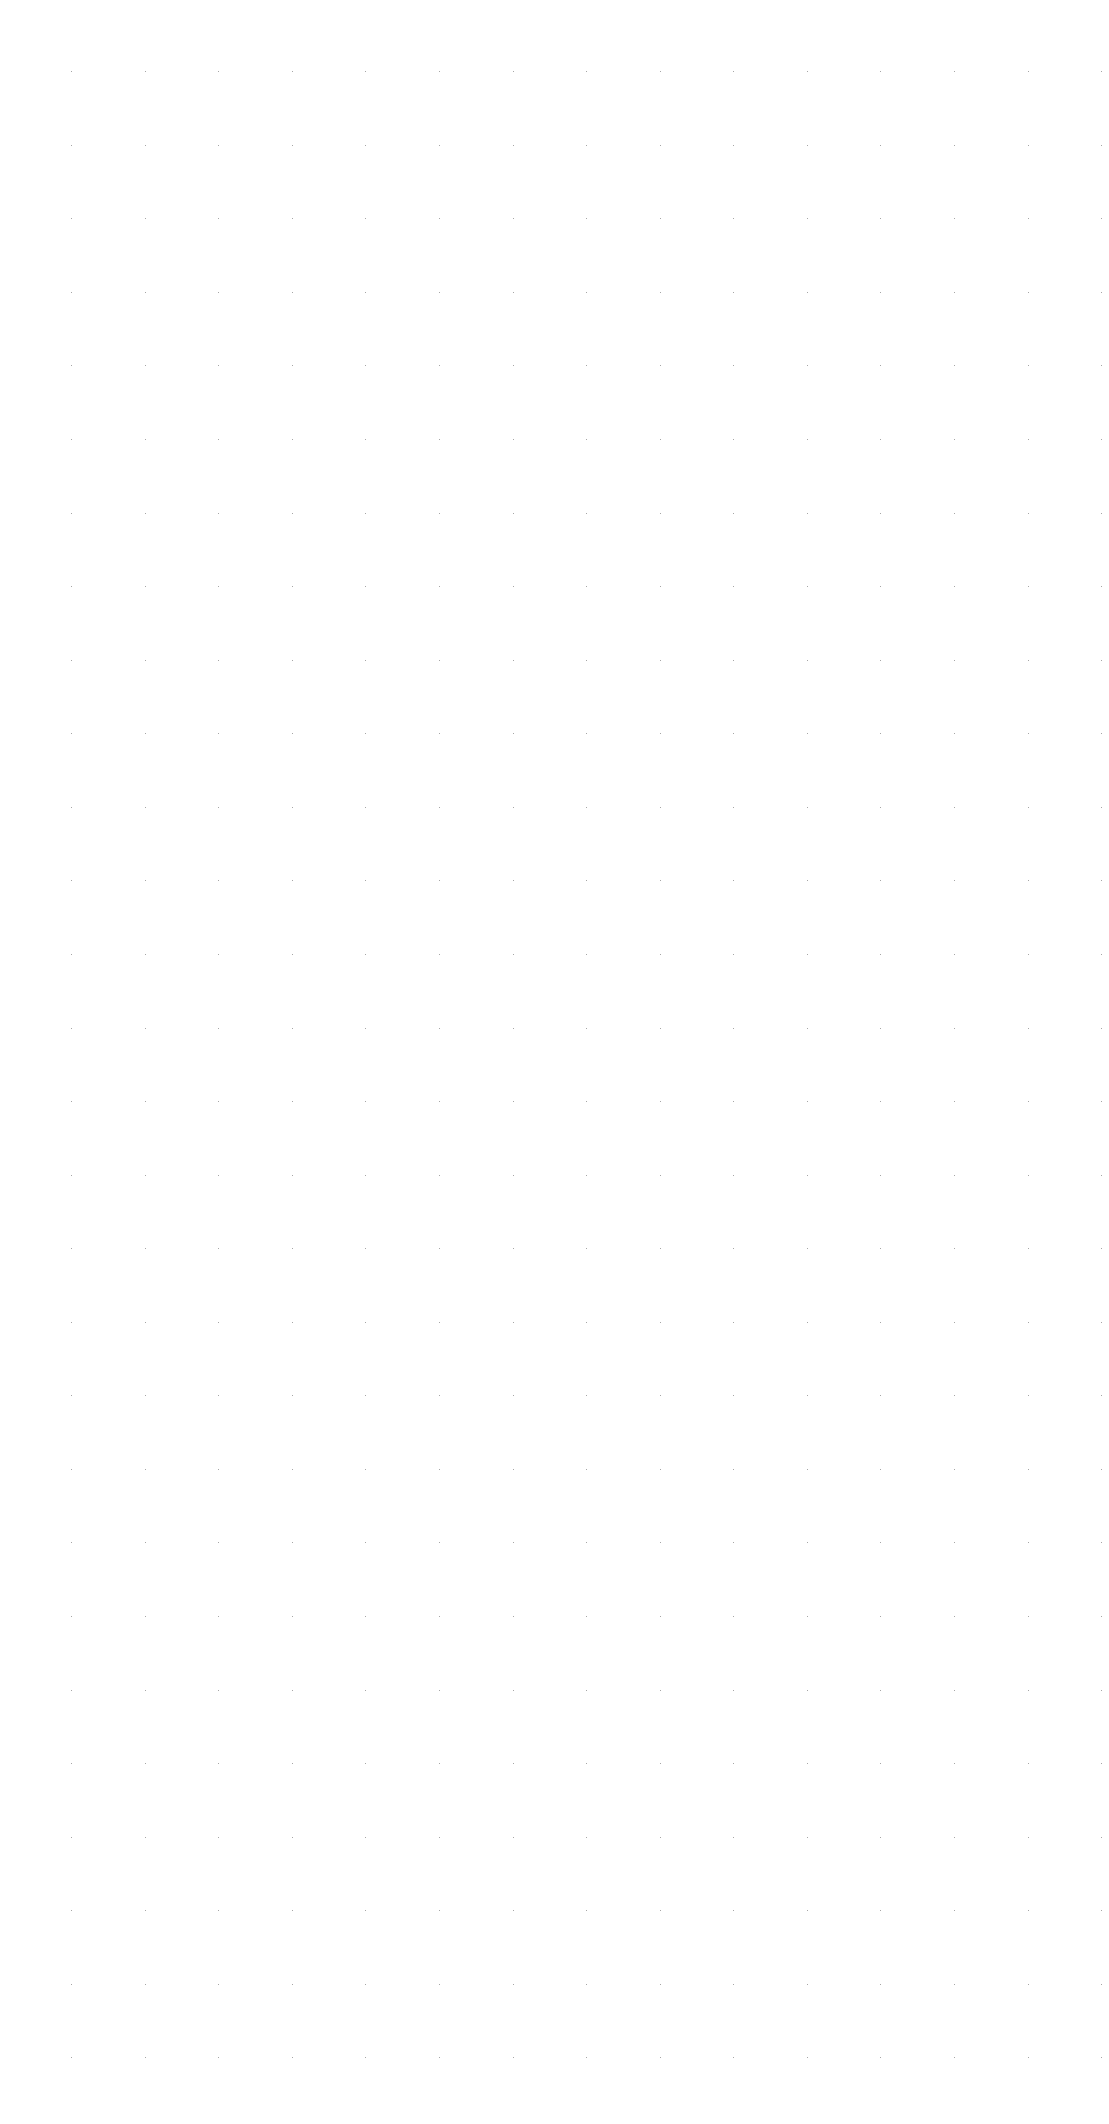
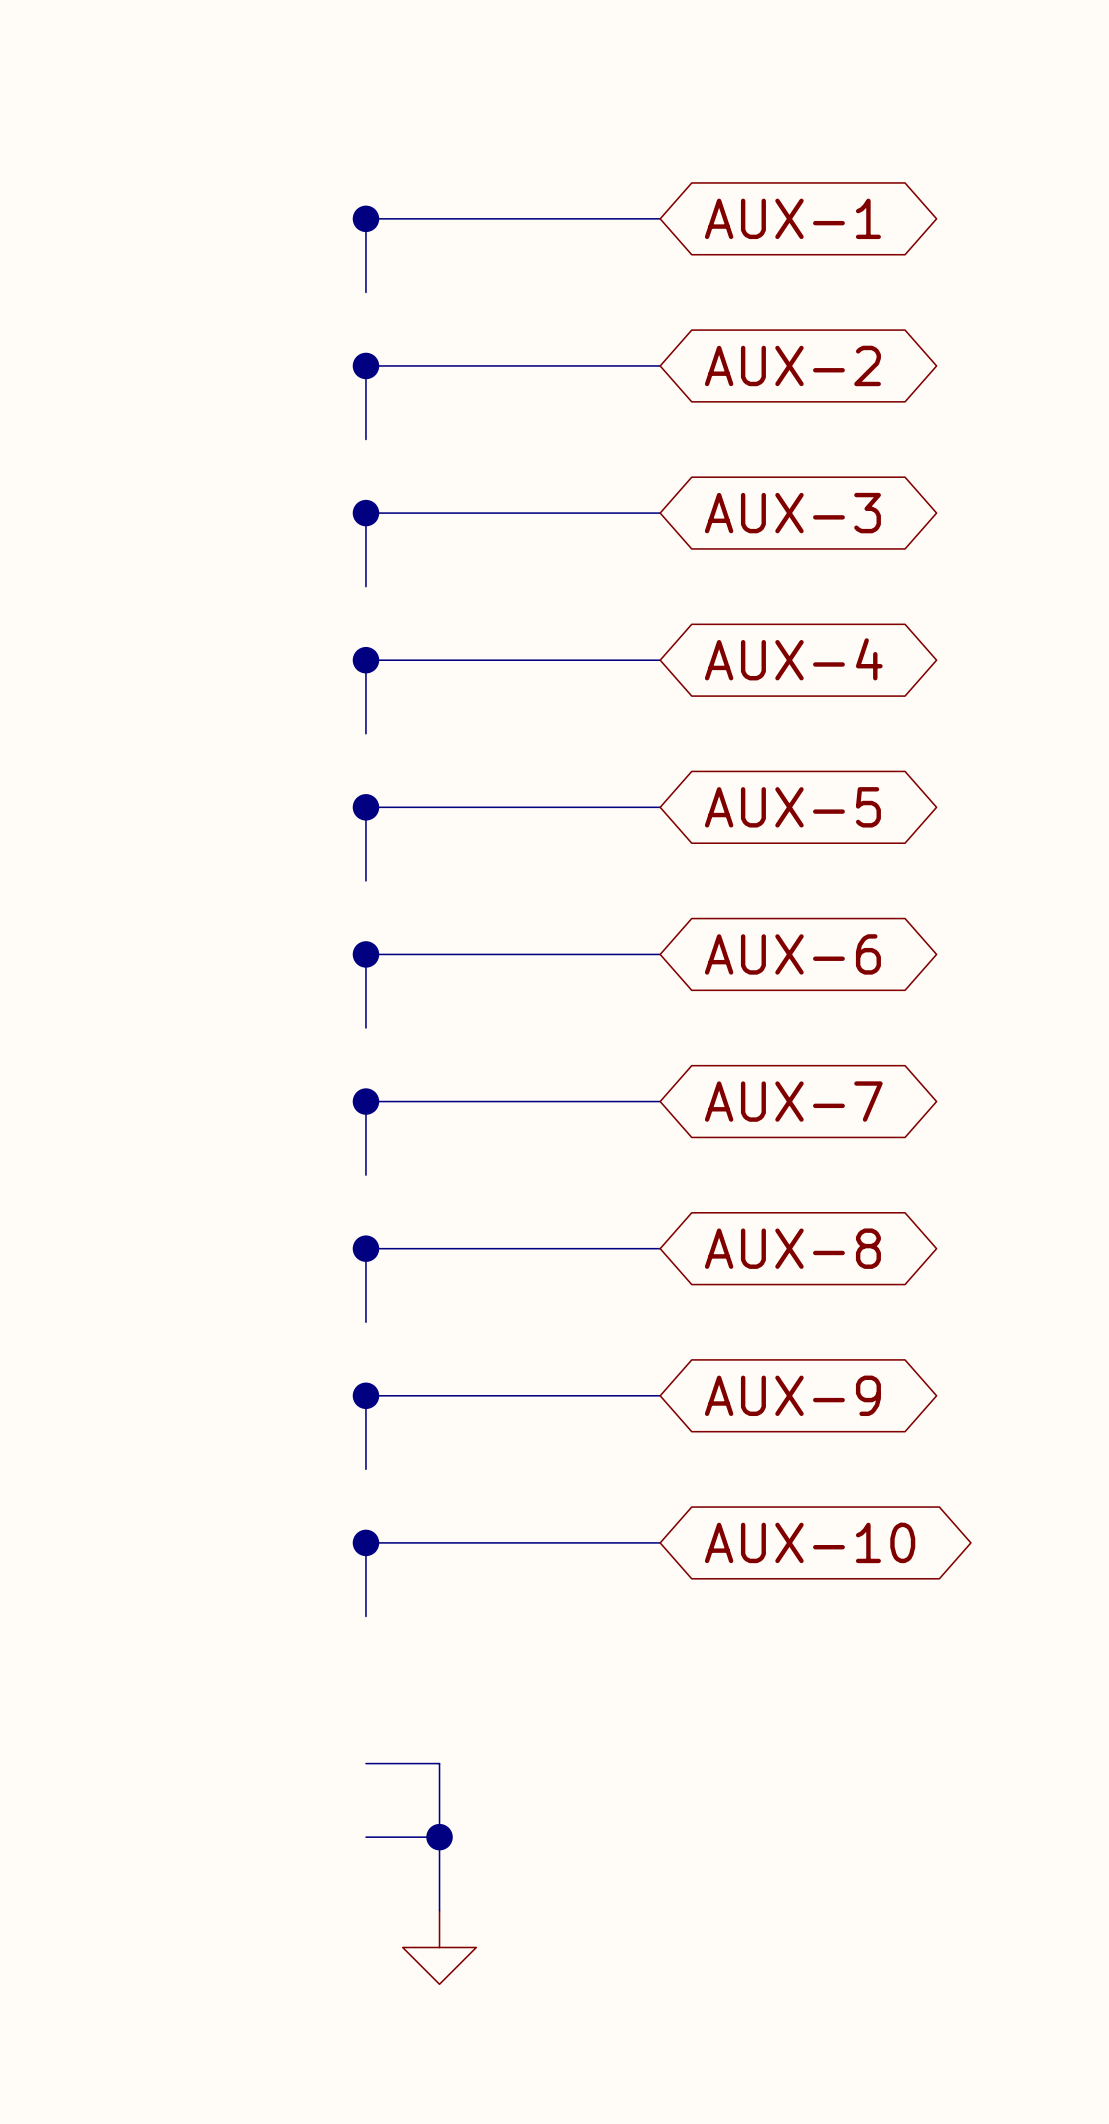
junction: none -> (365, 218)
wire: none -> (660, 218) (365, 218) (365, 292)
global label: none -> AUX-1 (792, 218)
junction: none -> (365, 365)
wire: none -> (660, 365) (365, 365) (365, 439)
global label: none -> AUX-2 (792, 365)
junction: none -> (365, 513)
wire: none -> (660, 513) (365, 513) (365, 586)
global label: none -> AUX-3 (792, 513)
junction: none -> (365, 660)
wire: none -> (660, 660) (365, 660) (365, 733)
global label: none -> AUX-4 (793, 659)
junction: none -> (365, 807)
wire: none -> (660, 807) (365, 807) (365, 880)
global label: none -> AUX-5 (792, 807)
junction: none -> (365, 954)
wire: none -> (660, 954) (365, 954) (365, 1028)
global label: none -> AUX-6 (792, 954)
junction: none -> (365, 1101)
wire: none -> (660, 1101) (365, 1101) (365, 1175)
global label: none -> AUX-7 (793, 1101)
junction: none -> (365, 1248)
wire: none -> (660, 1248) (365, 1248) (365, 1322)
global label: none -> AUX-8 (792, 1248)
junction: none -> (365, 1395)
wire: none -> (660, 1395) (365, 1395) (365, 1469)
global label: none -> AUX-9 (792, 1395)
junction: none -> (365, 1542)
wire: none -> (660, 1542) (365, 1542) (365, 1616)
global label: none -> AUX-10 (810, 1542)
wire: none -> (365, 1763) (439, 1763) (439, 1910)
wire: none -> (365, 1837) (439, 1837)
junction: none -> (439, 1837)
power symbol: none -> (439, 1947)

